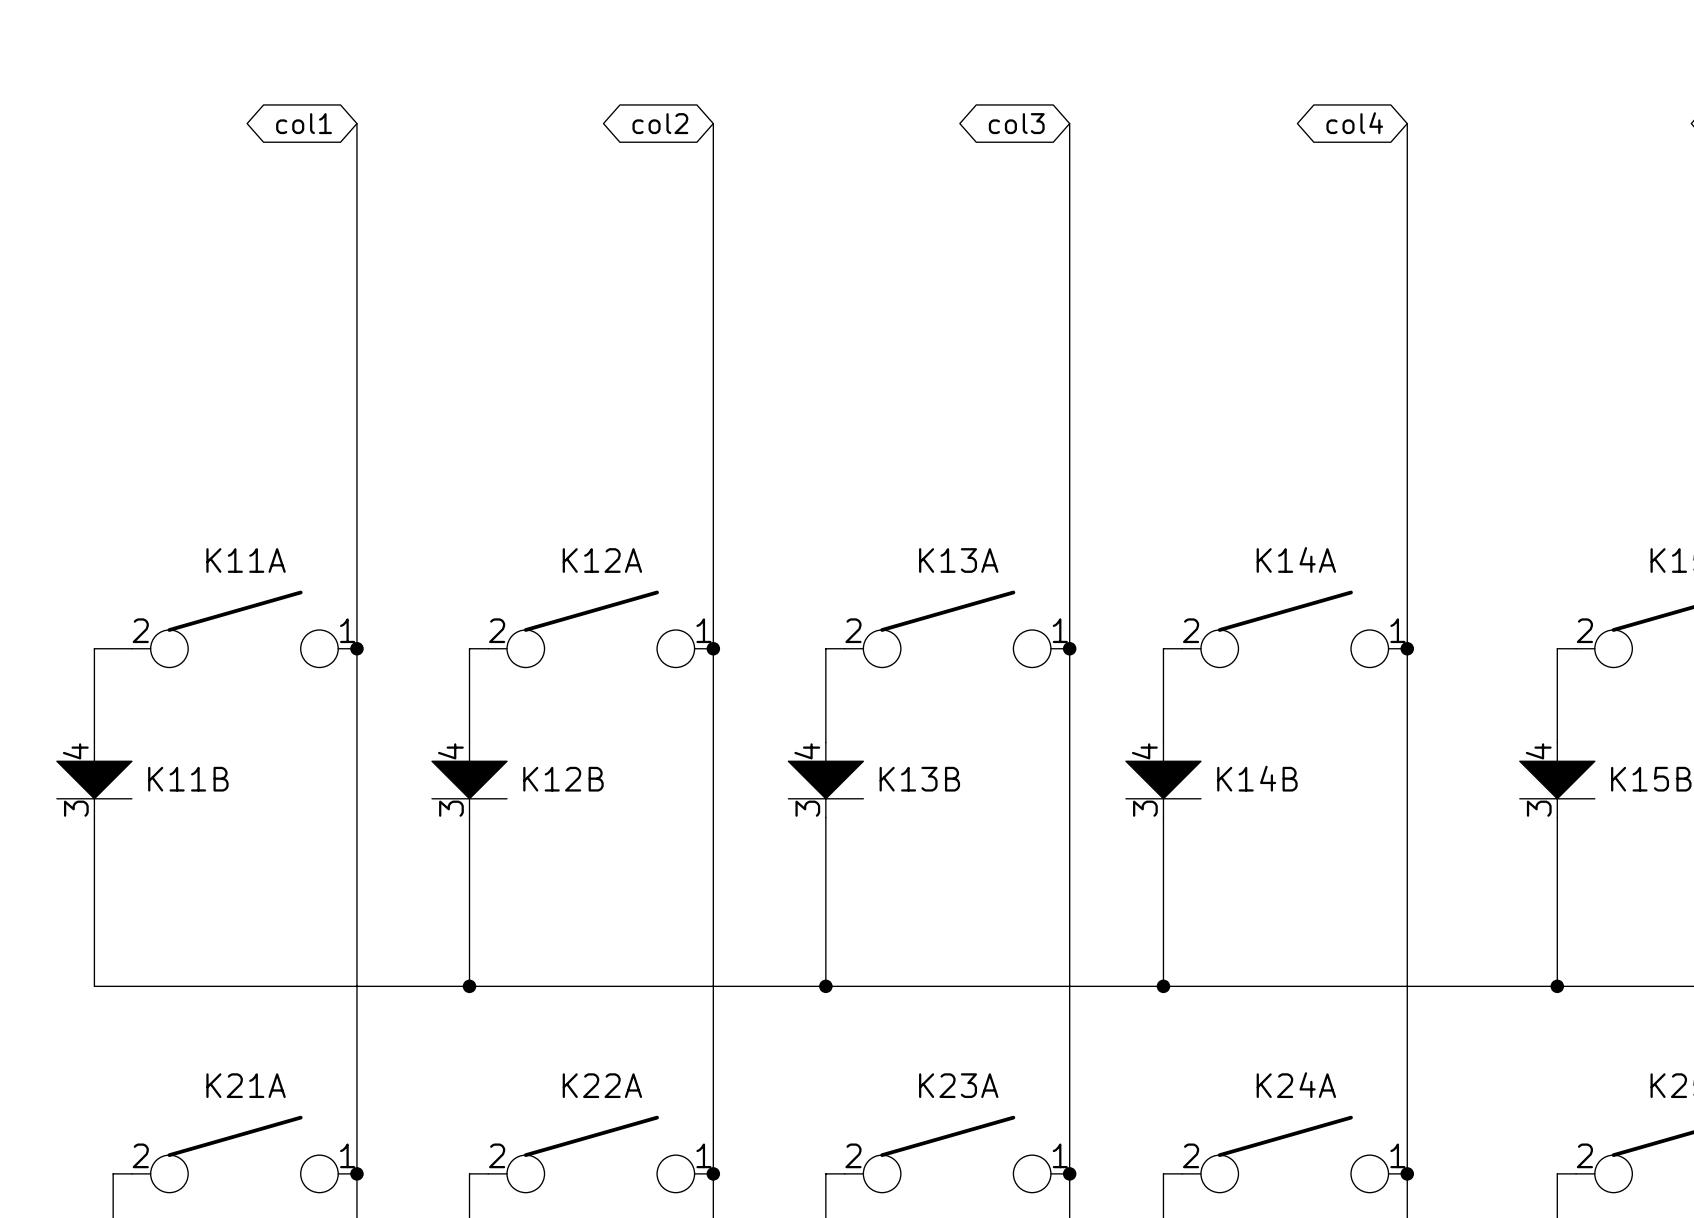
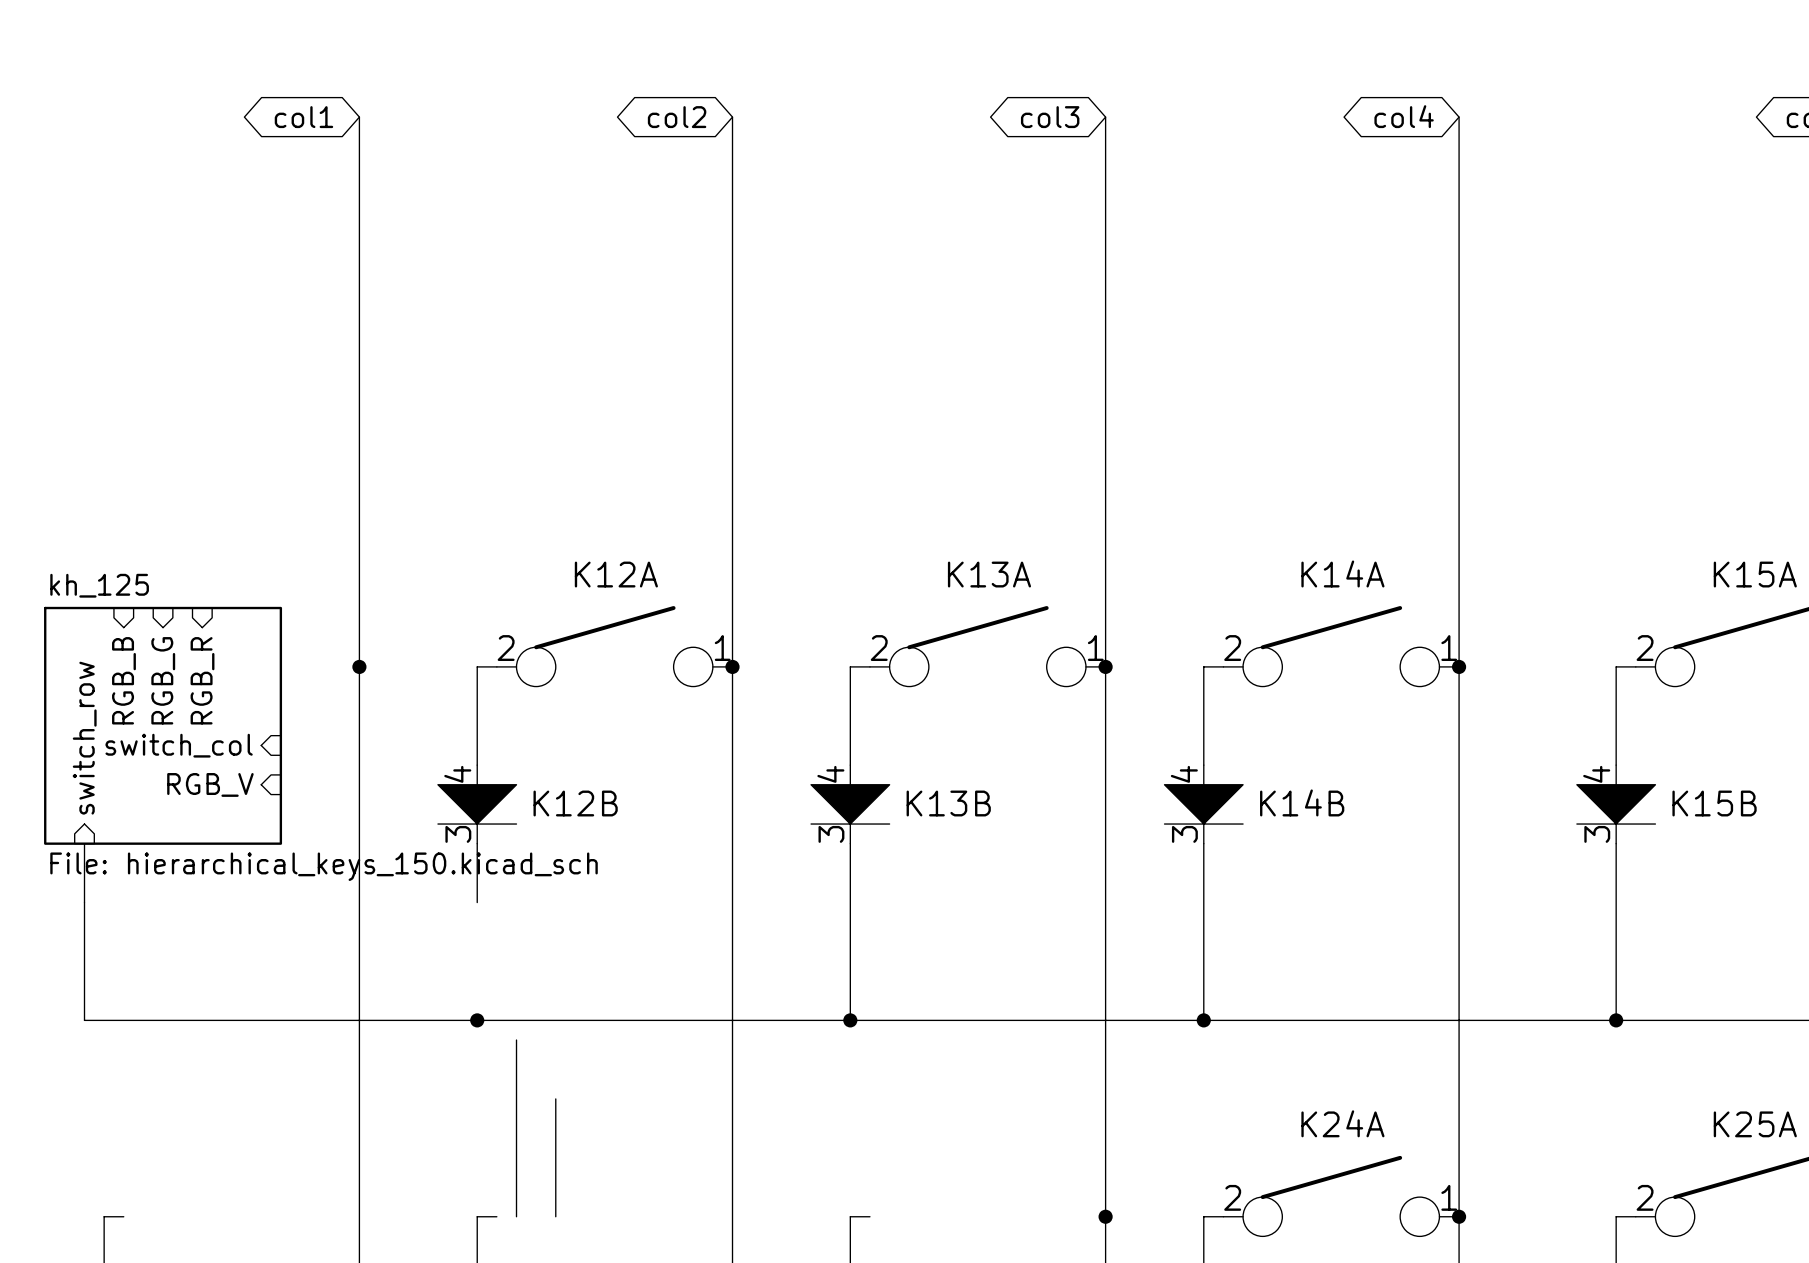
K11A: (244, 629) -> none
wire: (131, 648) (94, 648) (94, 742) -> none
sheet pin: none -> RGB_B (123, 680)
sheet pin: none -> RGB_G (163, 680)
sheet pin: none -> RGB_R (202, 680)
sheet kh_125: none -> File: hierarchical_keys_150.kicad_sch (163, 725)
sheet pin: none -> switch_row (84, 738)
sheet pin: none -> switch_col (179, 745)
sheet pin: none -> RGB_V (210, 784)
K11B: (94, 780) -> none
wire: (469, 873) (469, 986) -> (555, 1098) (555, 1216)
wire: none -> (516, 1040) (516, 1216)
K21A: (244, 1154) -> none
K22A: (600, 1154) -> none
K23A: (957, 1154) -> none
junction: (356, 1173) -> none
junction: (713, 1173) -> none

